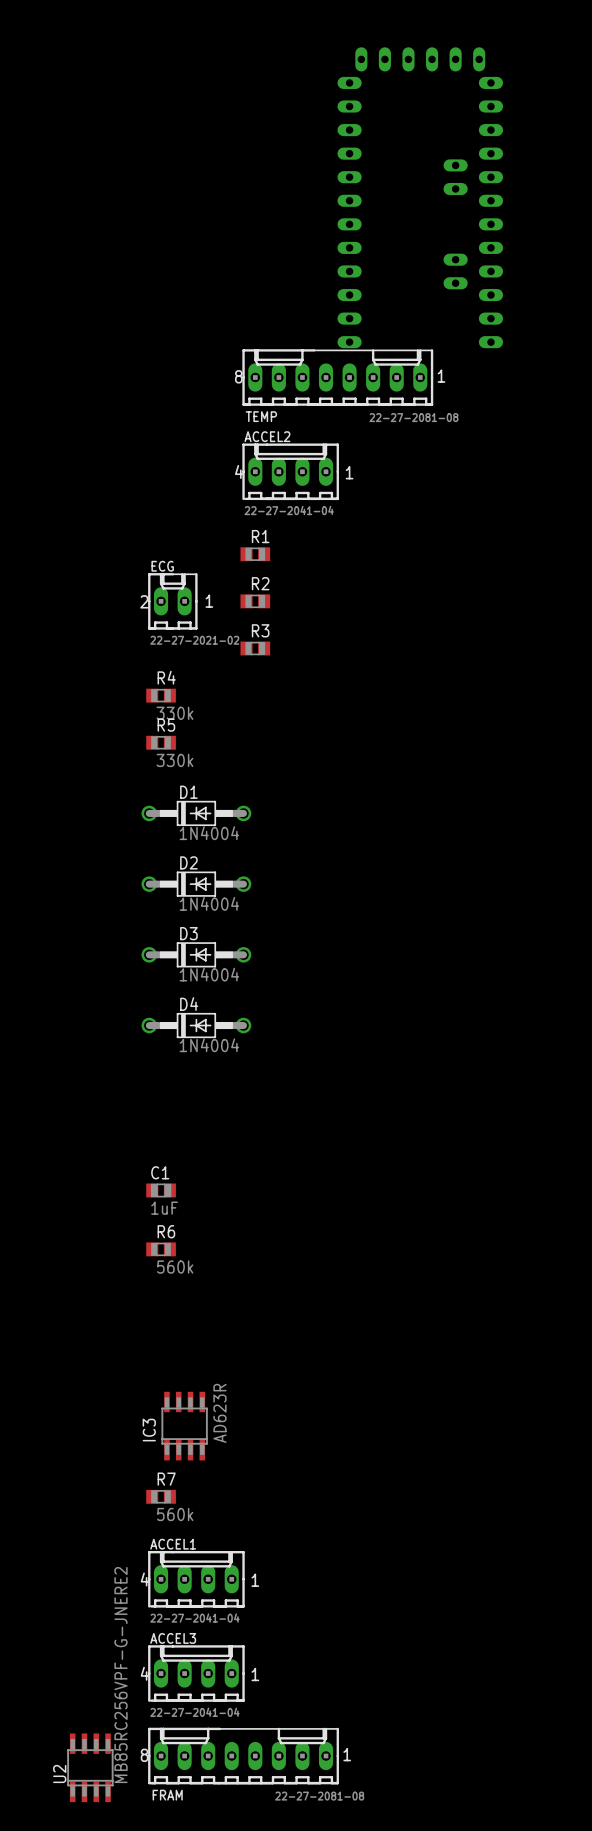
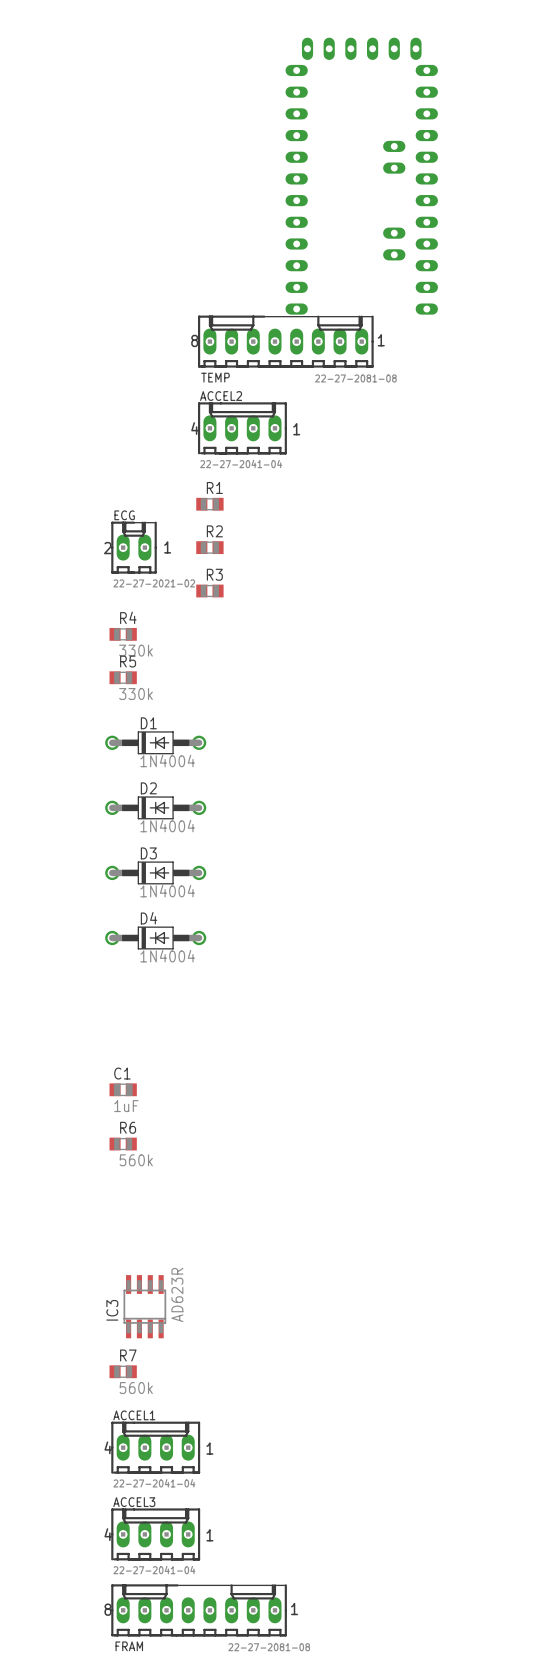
U2: MB85RC256VPF-G-JNERE2 (90, 1767) -> none

